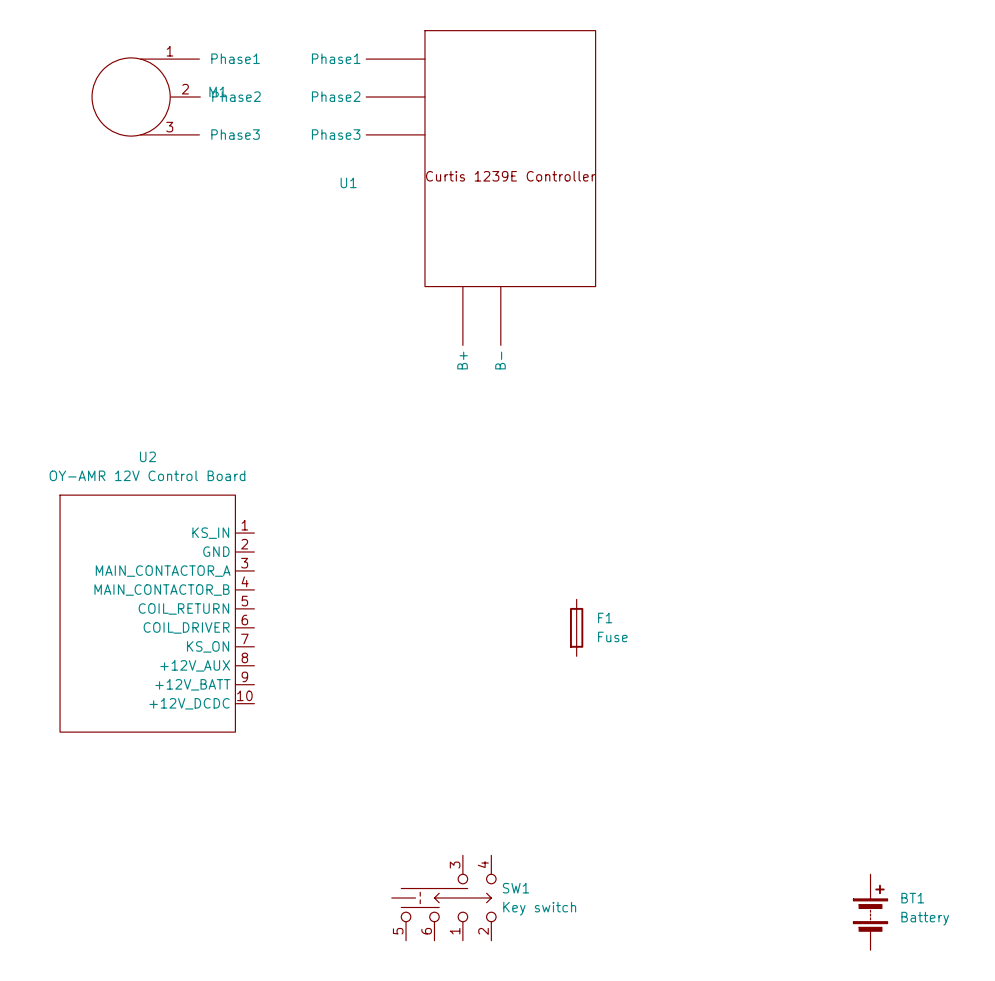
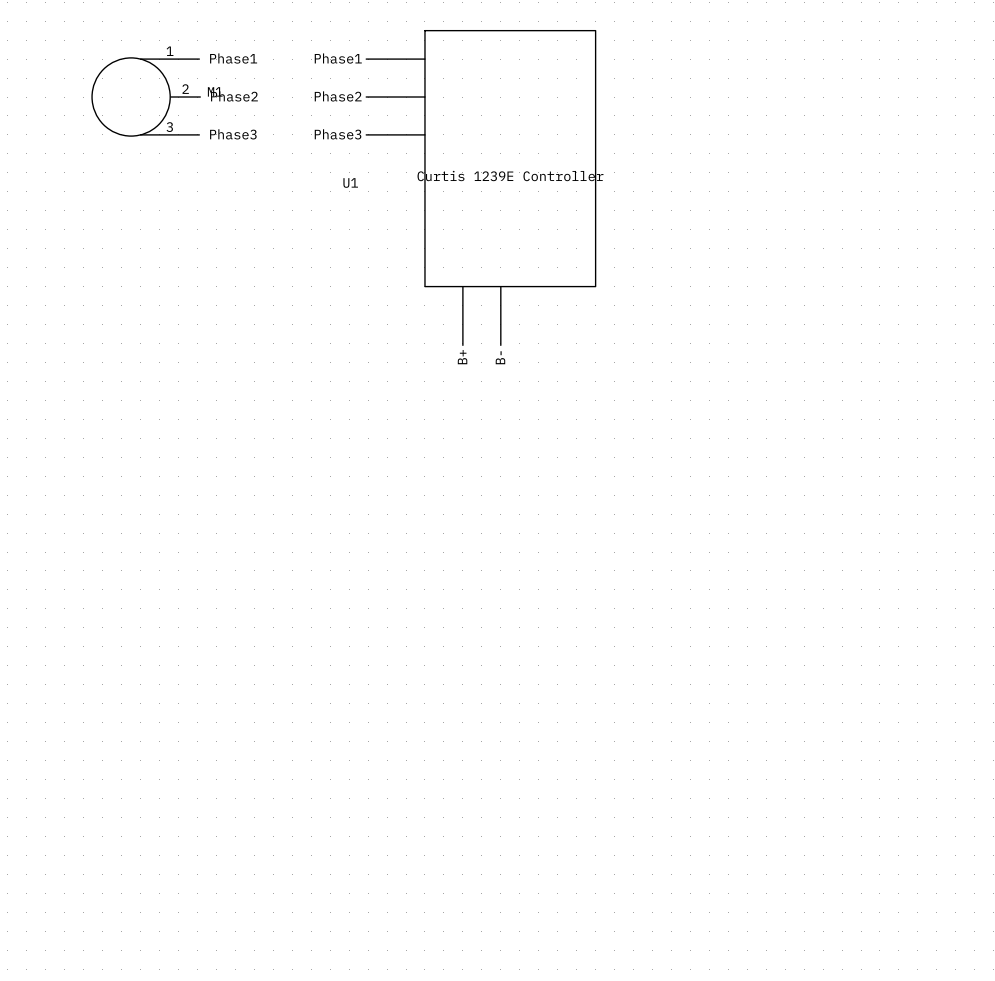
U2: OY-AMR 12V Control Board (157, 613) -> none
F1: Fuse (576, 627) -> none
SW1: Key switch (443, 898) -> none
BT1: Battery (870, 912) -> none

